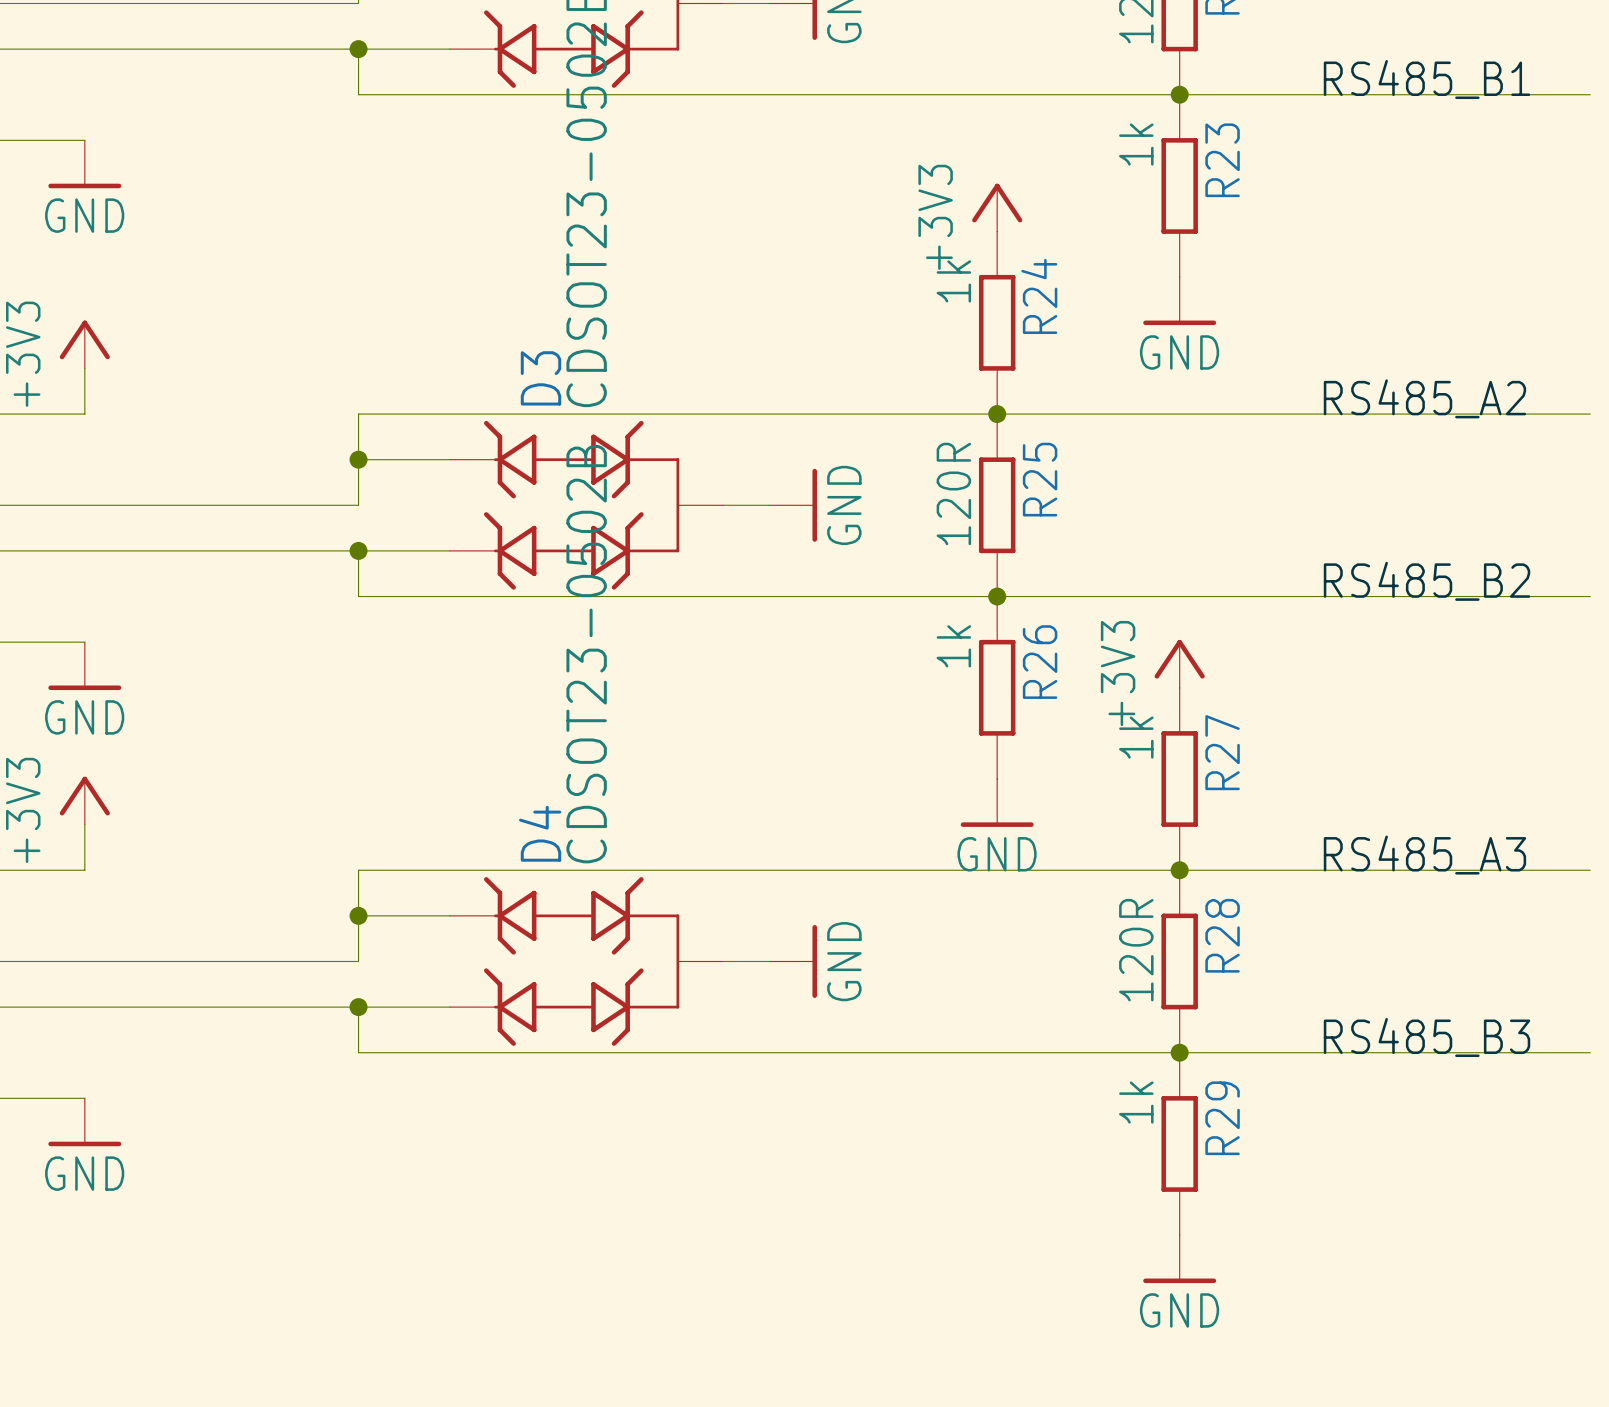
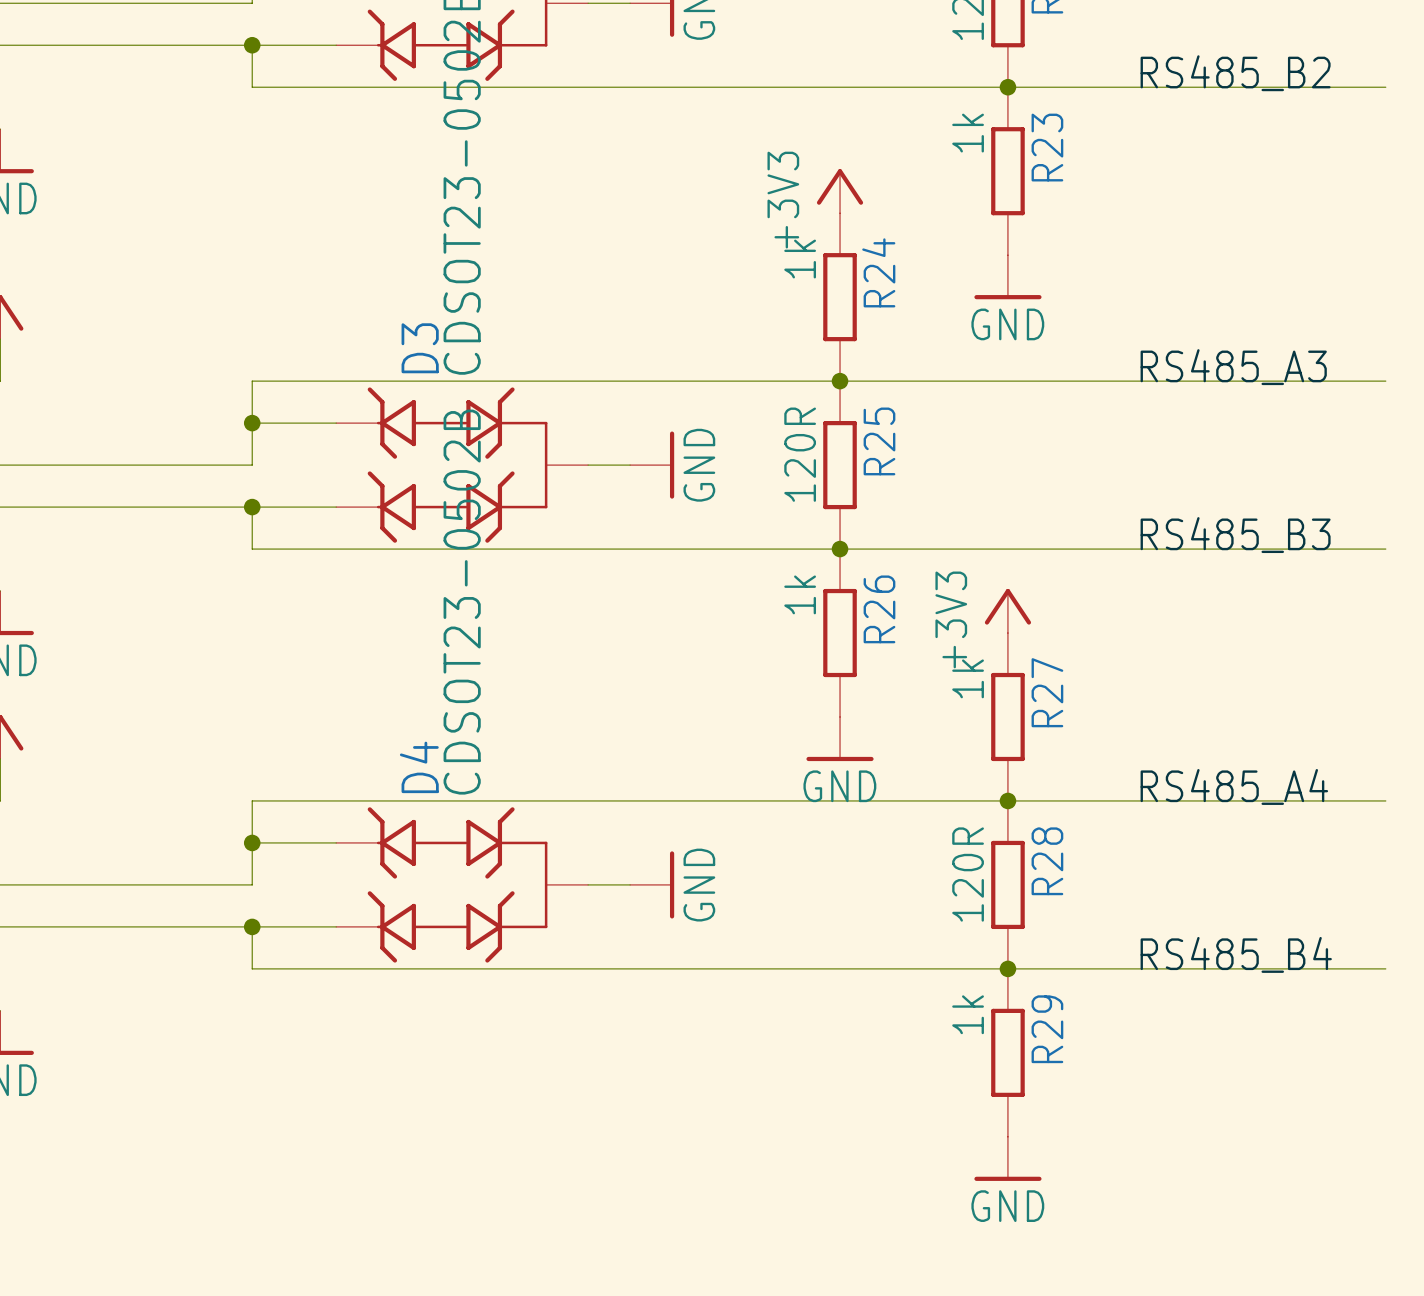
label: RS485_B1 (1427, 79) -> RS485_B2 (1235, 73)
label: RS485_A2 (1424, 398) -> RS485_A3 (1233, 367)
label: RS485_B2 (1427, 581) -> RS485_B3 (1235, 535)
label: RS485_A3 (1424, 855) -> RS485_A4 (1234, 786)
label: RS485_B3 (1427, 1037) -> RS485_B4 (1236, 954)

